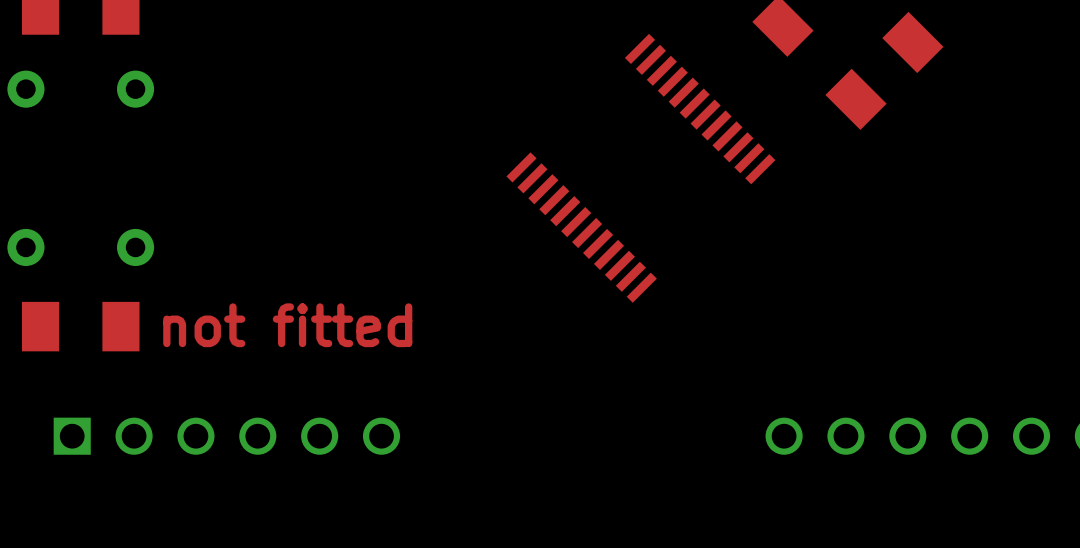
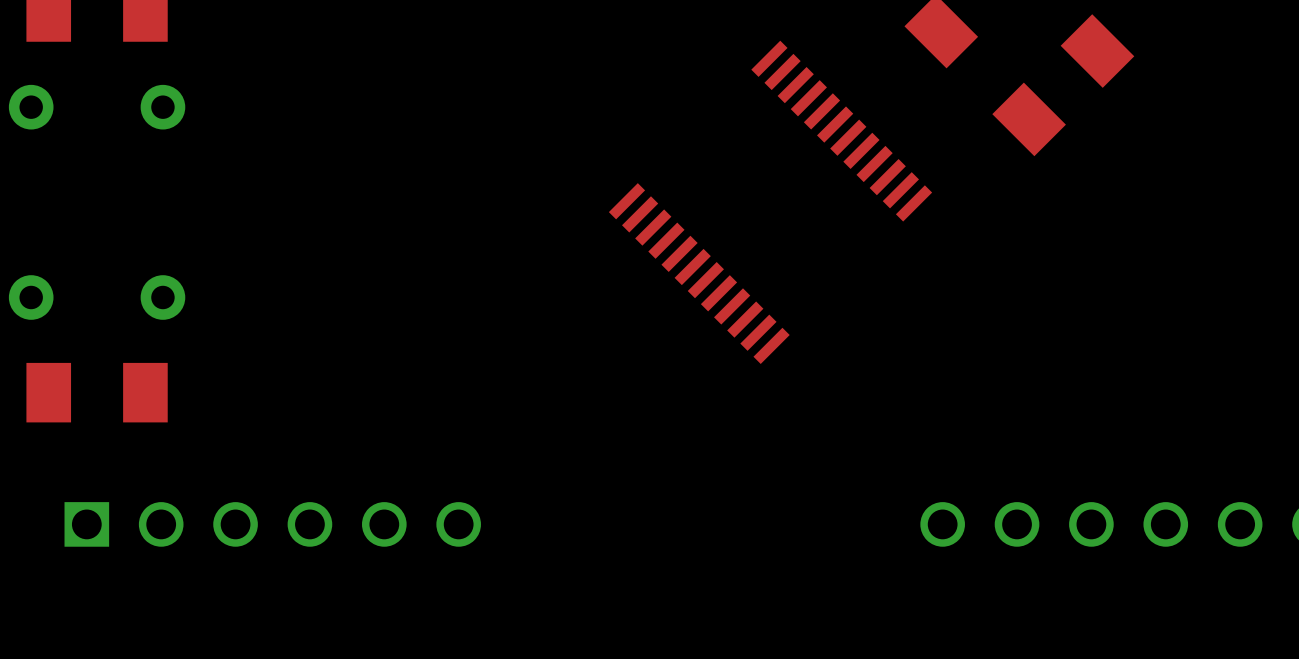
text: not fitted (287, 325) -> none

